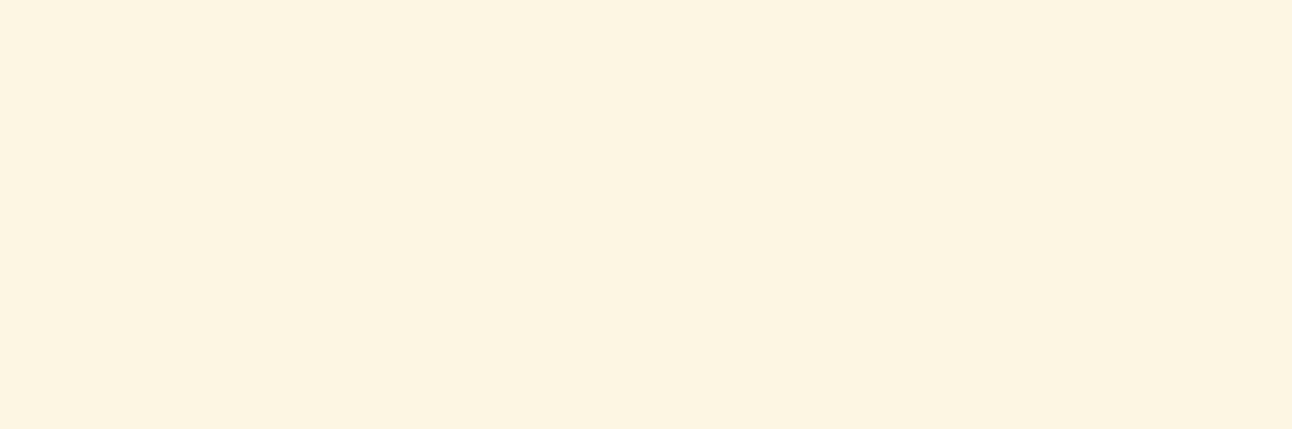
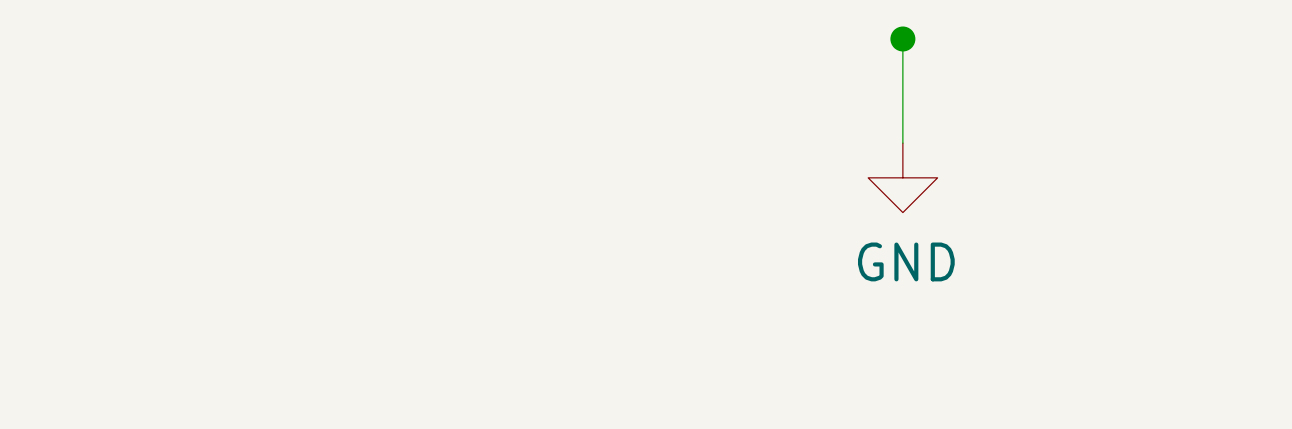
wire: none -> (902, 38) (902, 143)
junction: none -> (902, 38)
power symbol: none -> GND (902, 177)

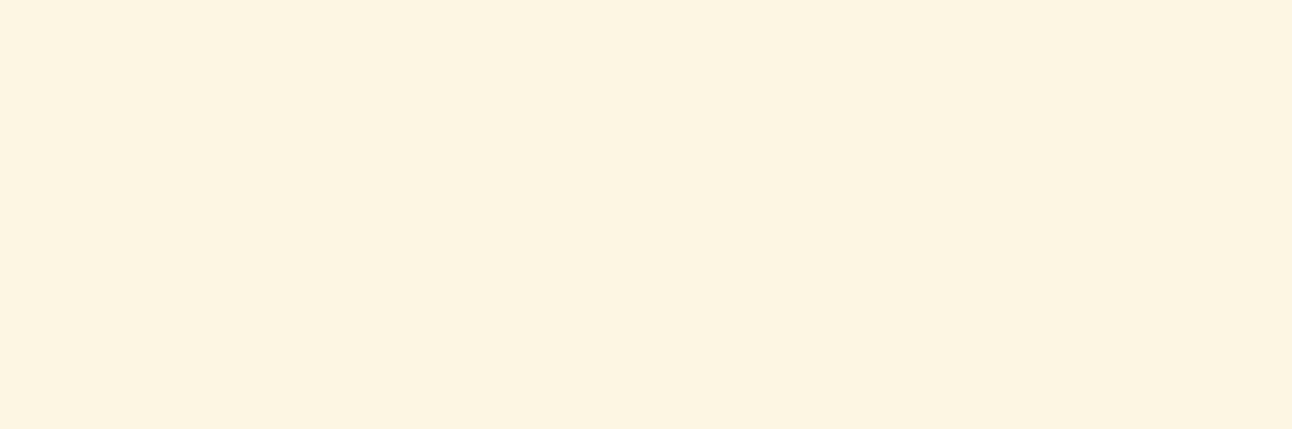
wire: (902, 38) (902, 143) -> none
junction: (902, 38) -> none
power symbol: GND (902, 177) -> none

